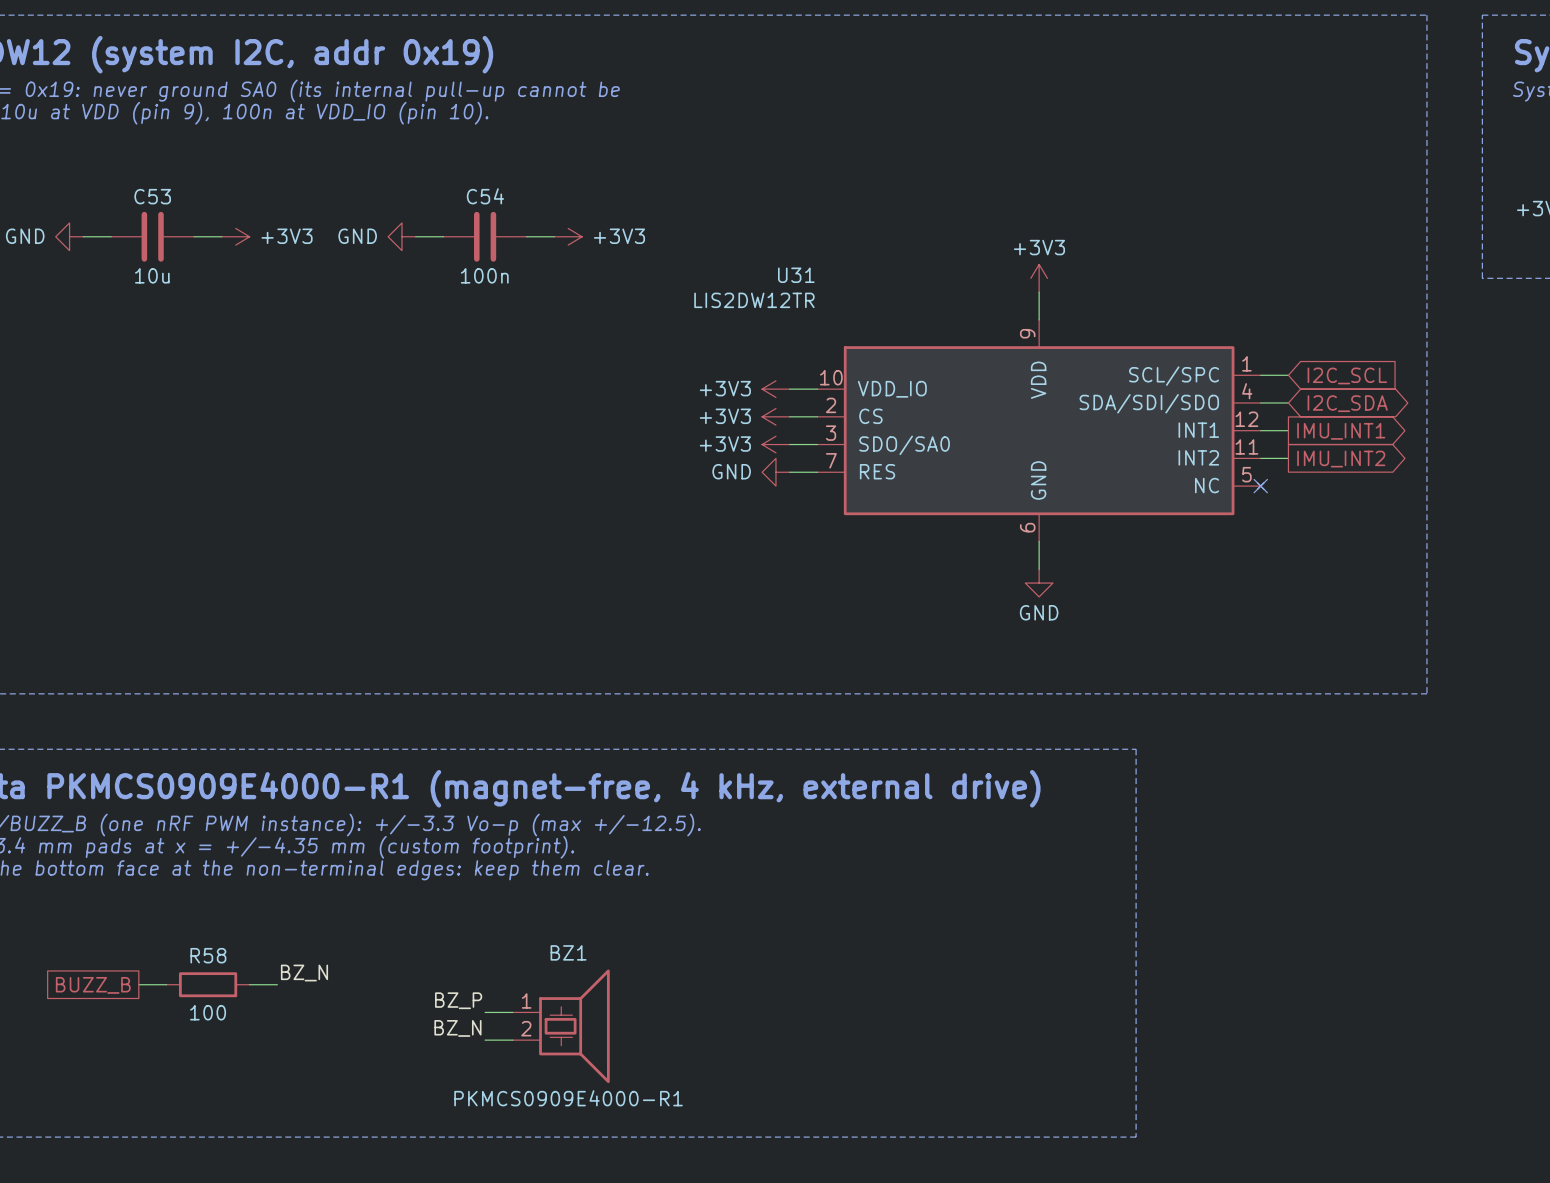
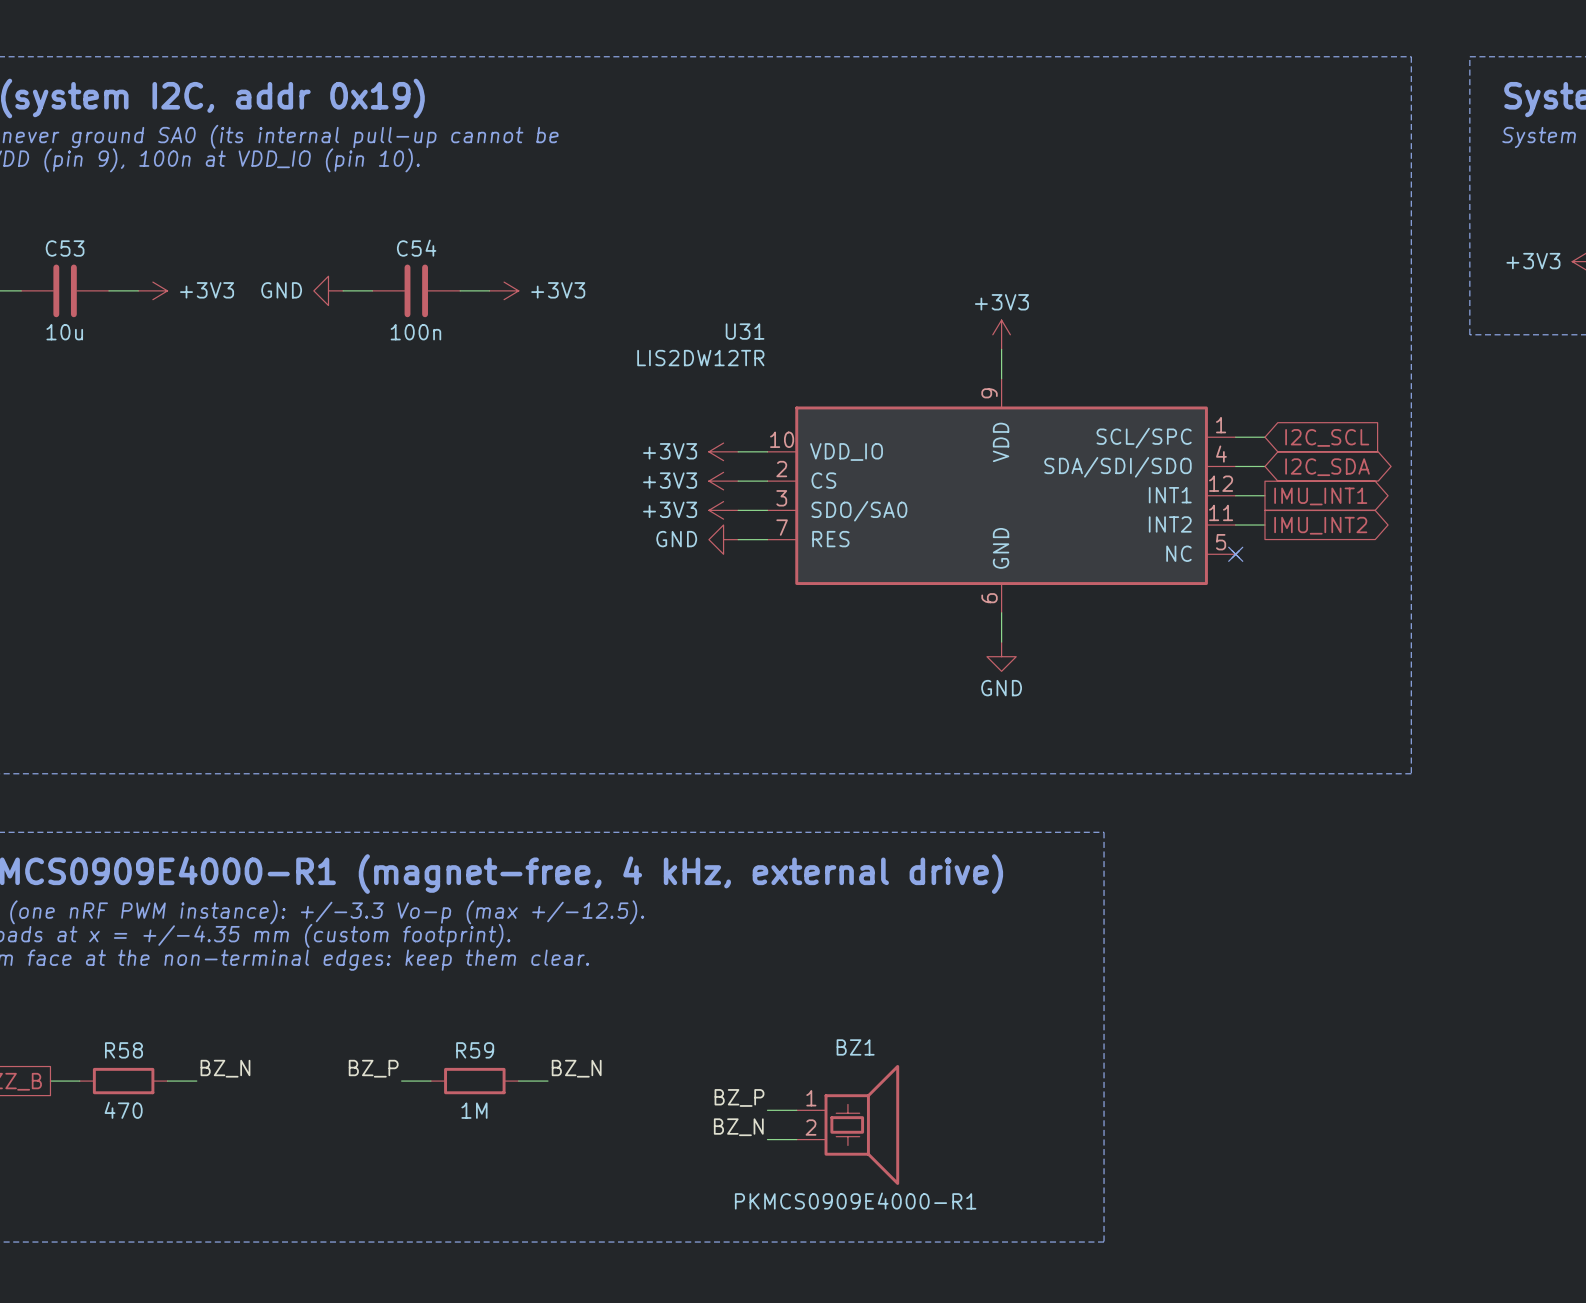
R59: none -> 1M (474, 1081)
label position: BZ_P (458, 1000) -> BZ_P (373, 1068)
label: none -> BZ_P (739, 1097)
R58 value: 100 (208, 1012) -> 470 (123, 1110)
wire: (485, 1012) (512, 1012) -> (401, 1081) (430, 1081)
wire: none -> (767, 1110) (796, 1110)
BZ1 position: (561, 1026) -> (847, 1124)
label position: BZ_N (457, 1028) -> BZ_N (576, 1068)
label: none -> BZ_N (738, 1127)
wire: (485, 1040) (512, 1040) -> (518, 1081) (547, 1081)
wire: none -> (767, 1139) (796, 1139)

